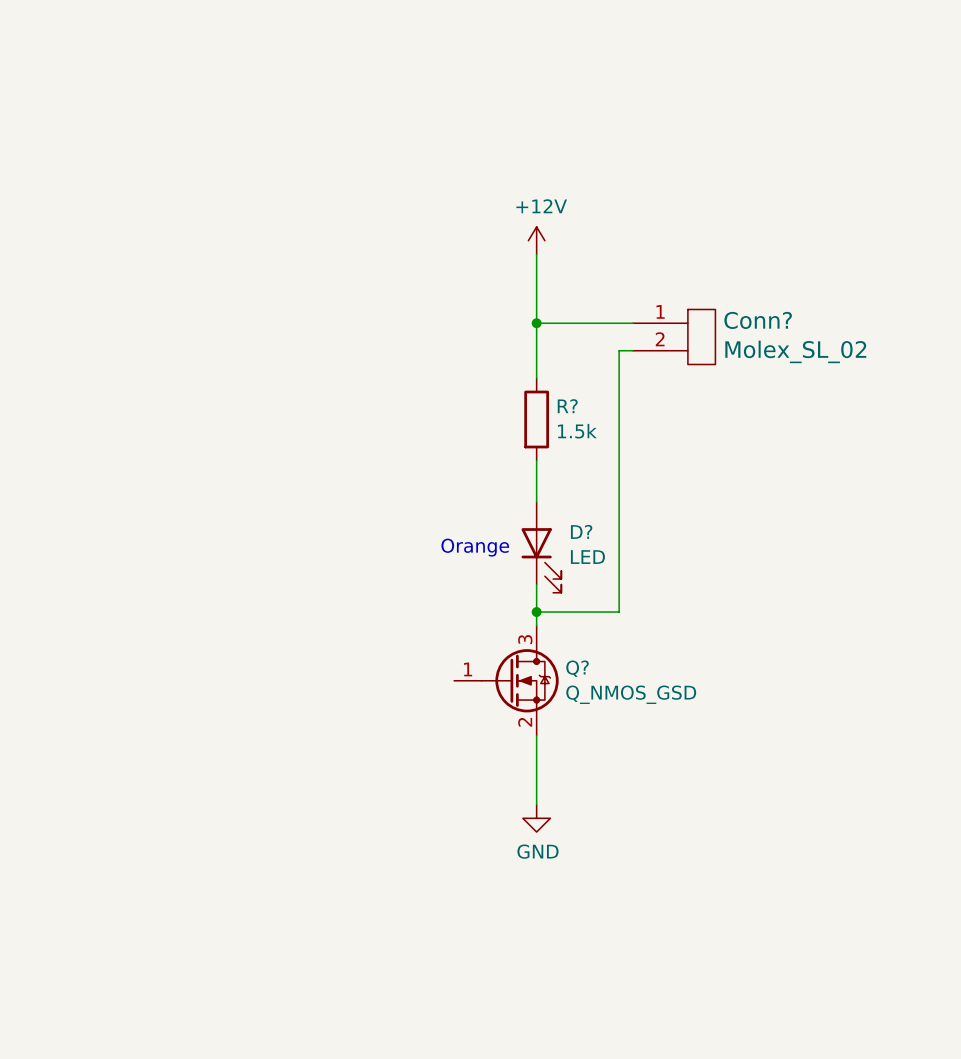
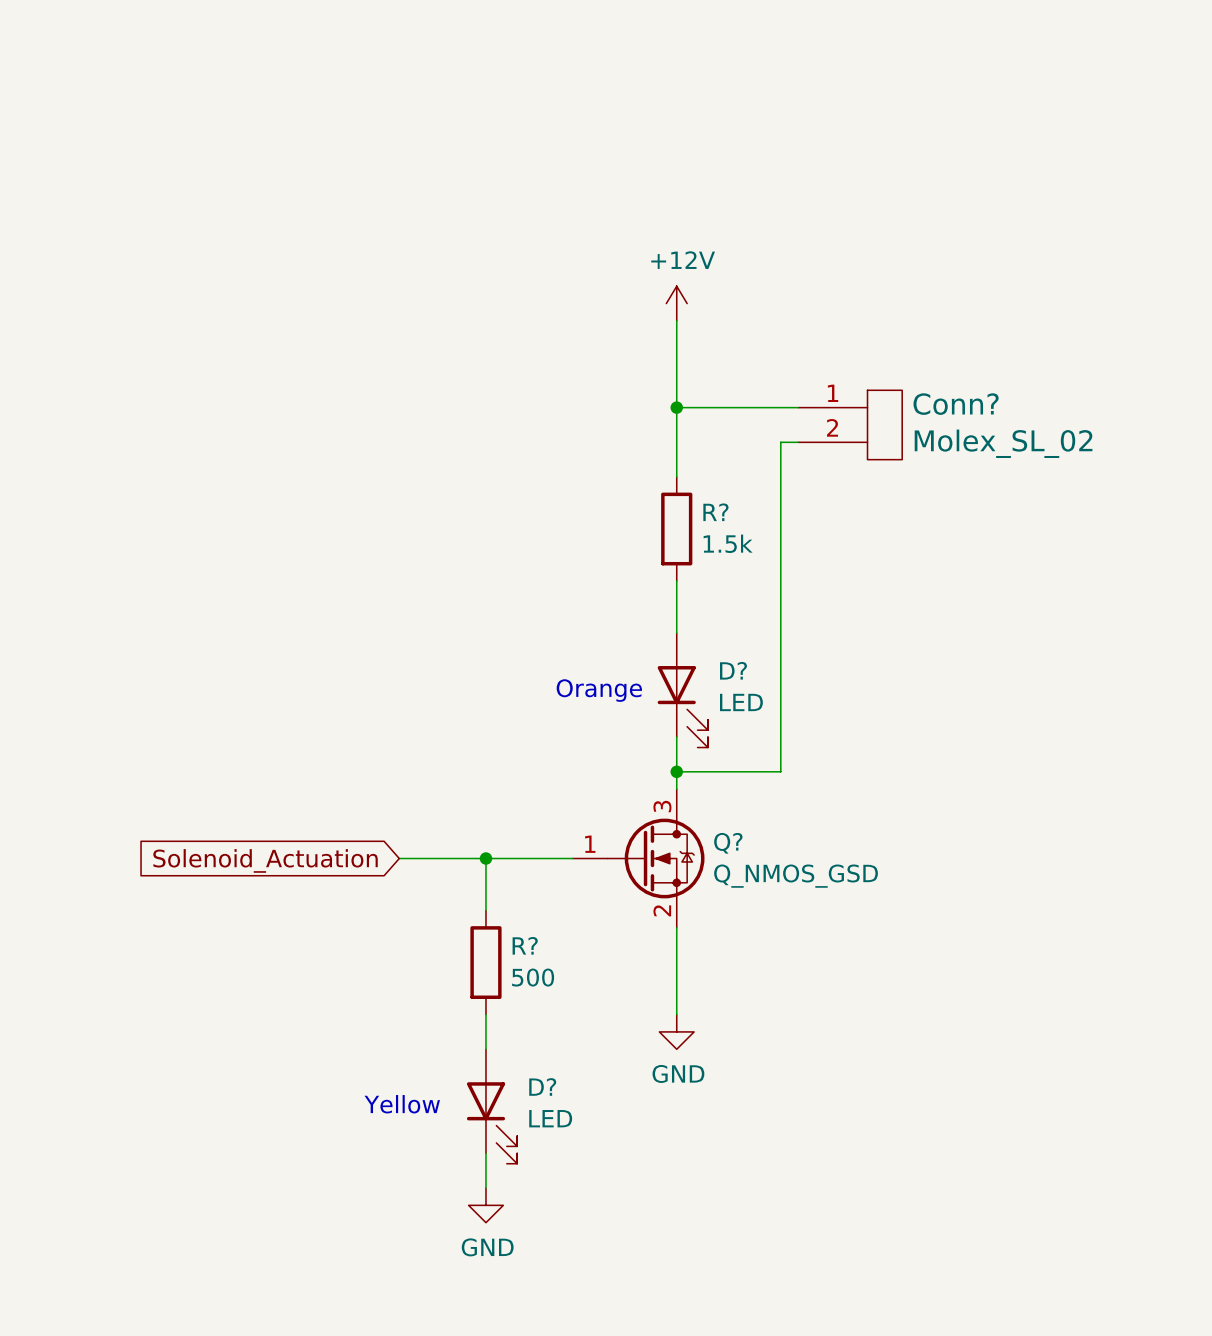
wire: none -> (399, 858) (572, 858)
wire: none -> (485, 858) (485, 910)
junction: none -> (485, 858)
global label: none -> Solenoid_Actuation (265, 860)
R?: none -> 500 (485, 962)
wire: none -> (485, 1014) (485, 1049)
text: none -> Yellow (402, 1104)
D?: none -> LED (492, 1106)
wire: none -> (485, 1153) (485, 1188)
power symbol: none -> GND (485, 1205)

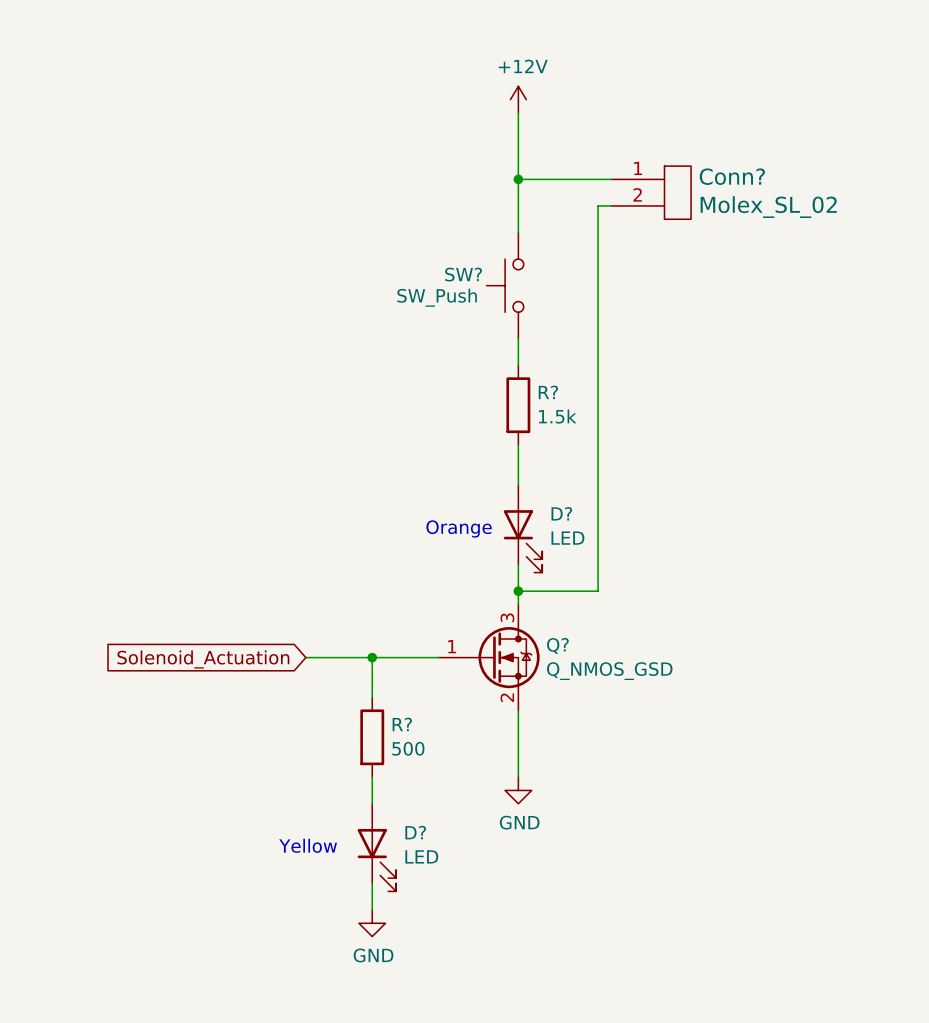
wire: none -> (518, 112) (518, 232)
junction: none -> (518, 179)
power symbol position: +12V (676, 303) -> +12V (518, 99)
wire: (676, 320) (676, 442) -> none
SW?: none -> SW_Push (505, 285)
wire: (676, 407) (798, 407) -> (518, 179) (611, 179)
junction: (676, 407) -> none
Conn? position: (850, 424) -> (651, 192)
wire: (780, 442) (798, 442) -> (598, 338) (598, 205) (611, 205)

